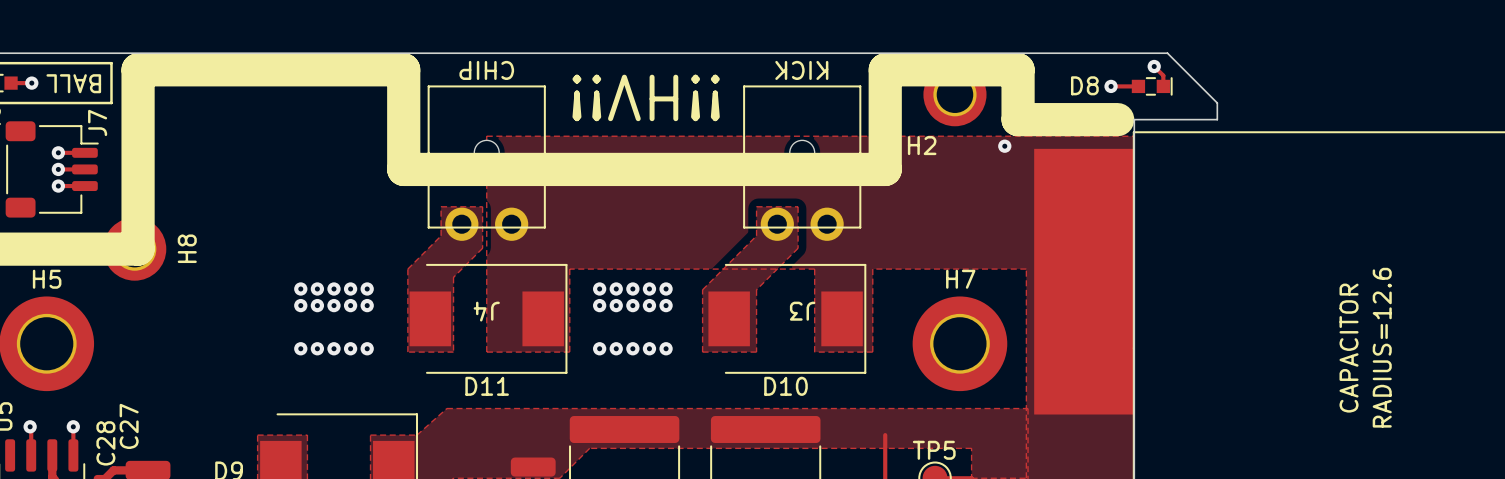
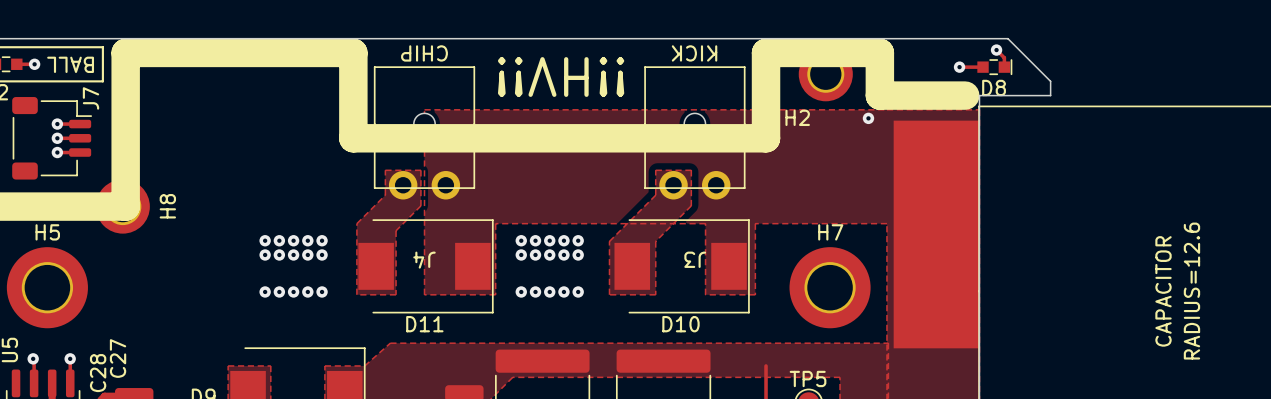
D8 name position: D8 (1084, 85) -> D8 (994, 87)

